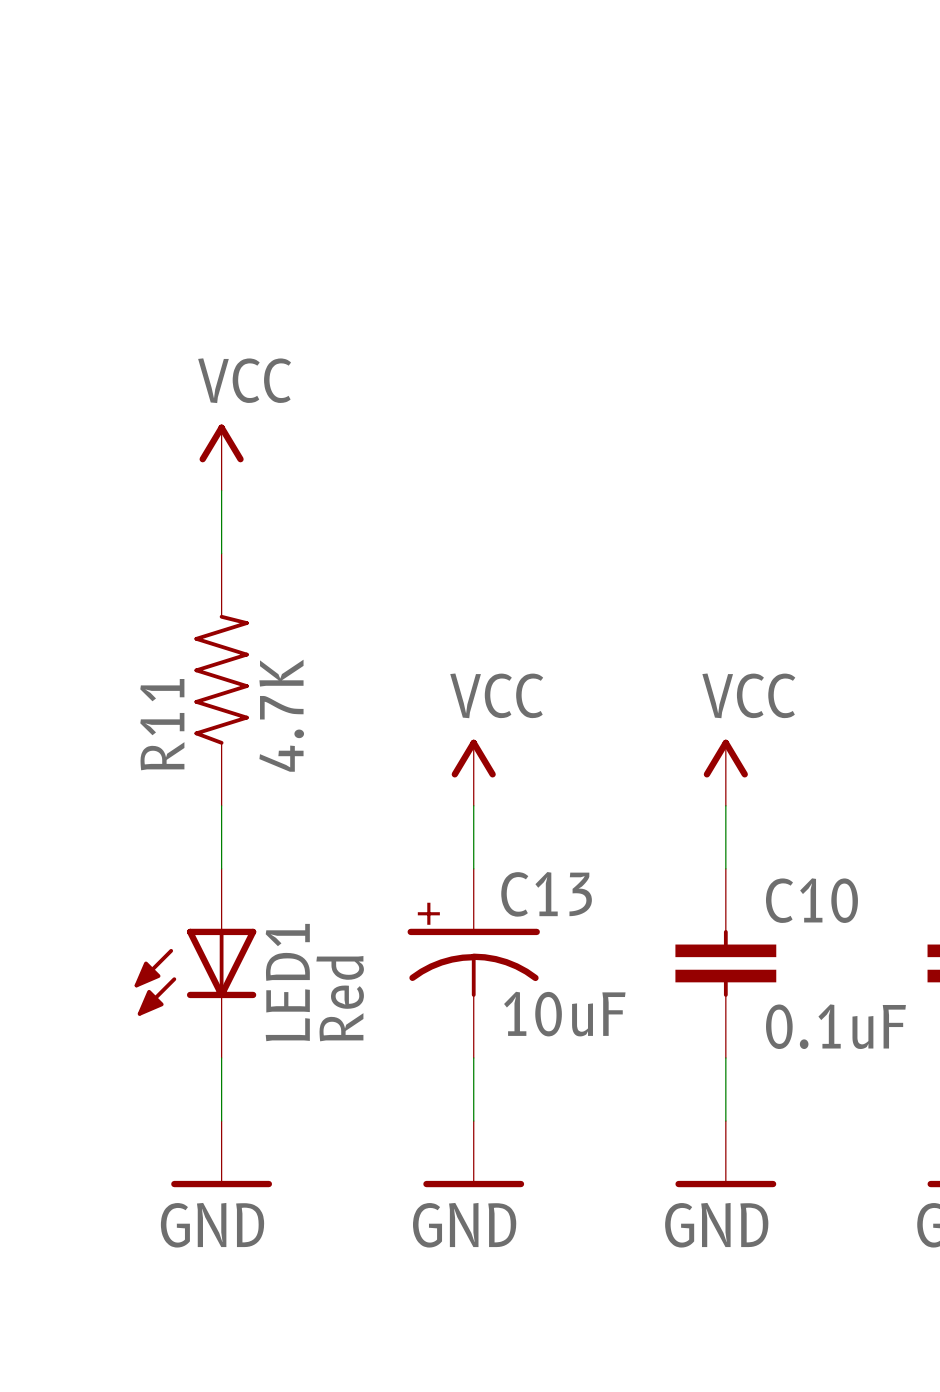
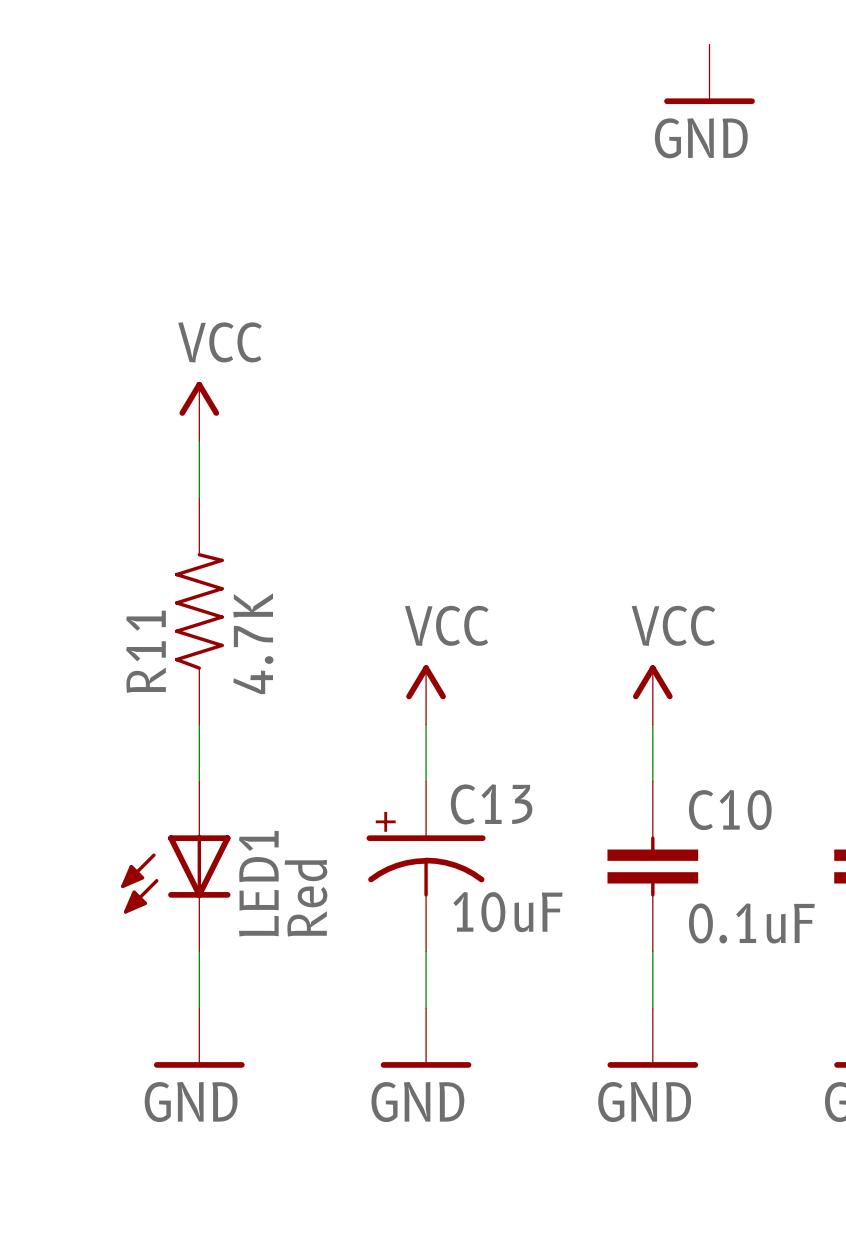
power symbol: none -> GND (709, 74)

